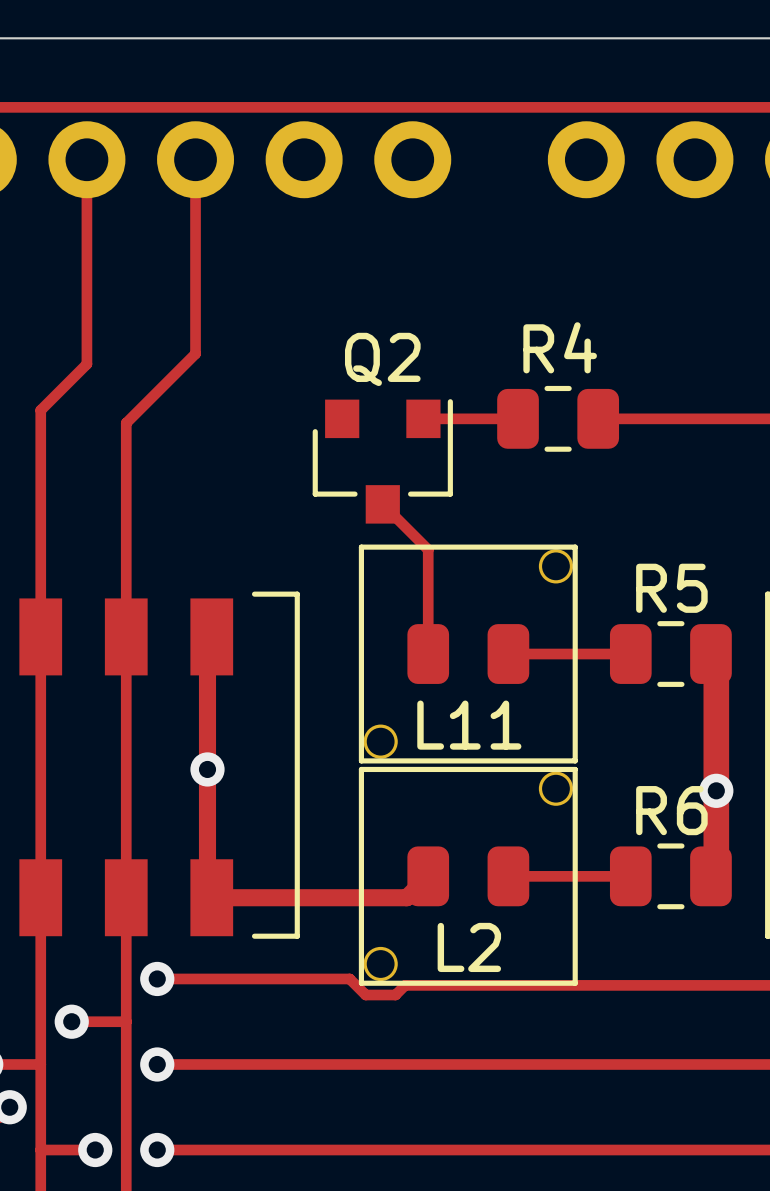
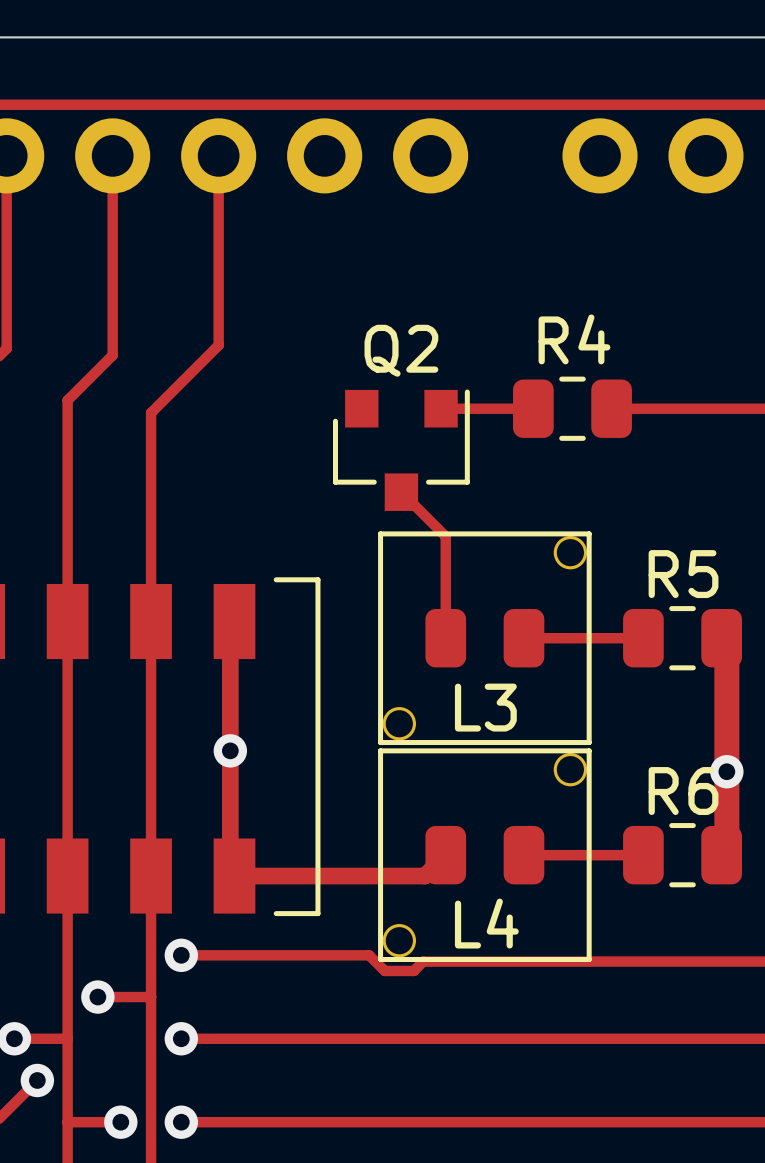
L11 name: L11 (469, 725) -> L3 (485, 707)
L2 name: L2 (469, 947) -> L4 (486, 923)

